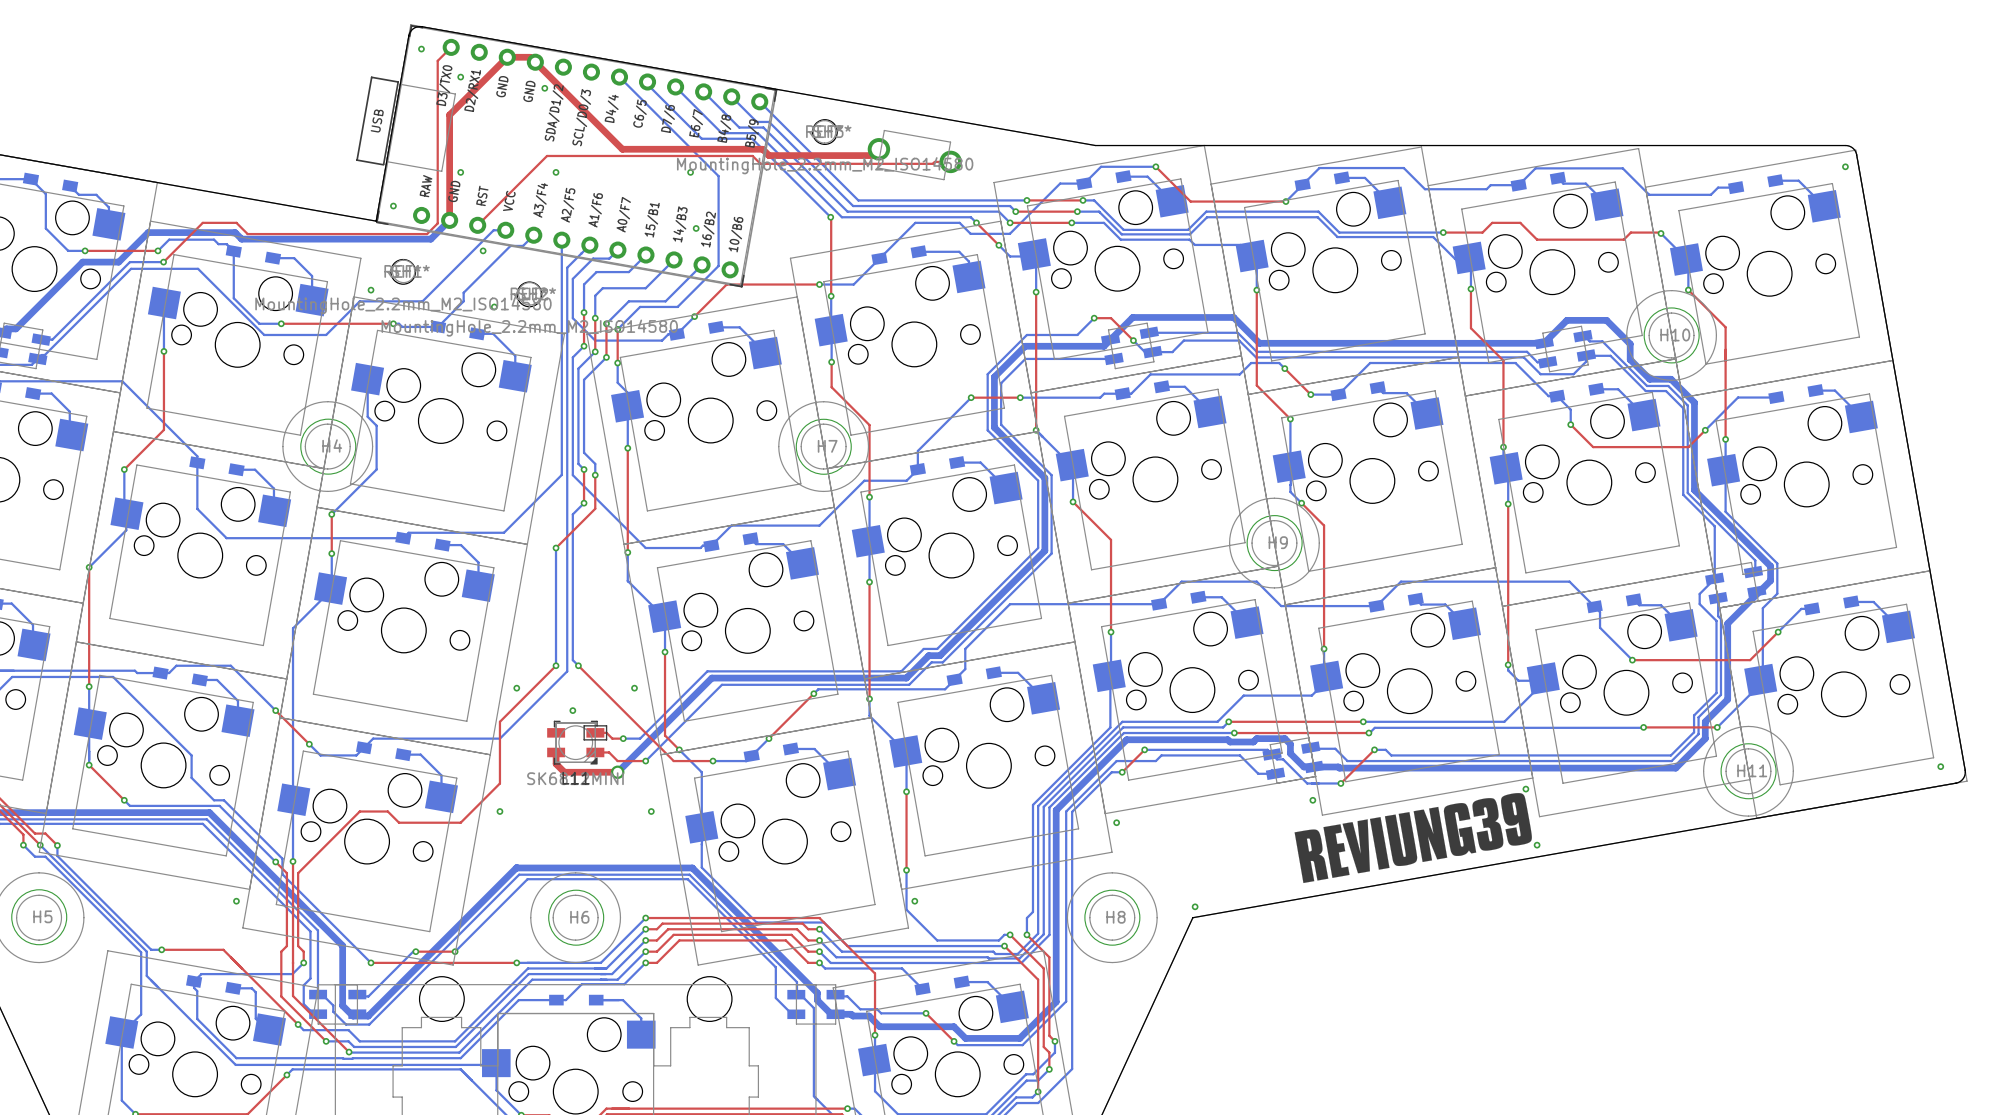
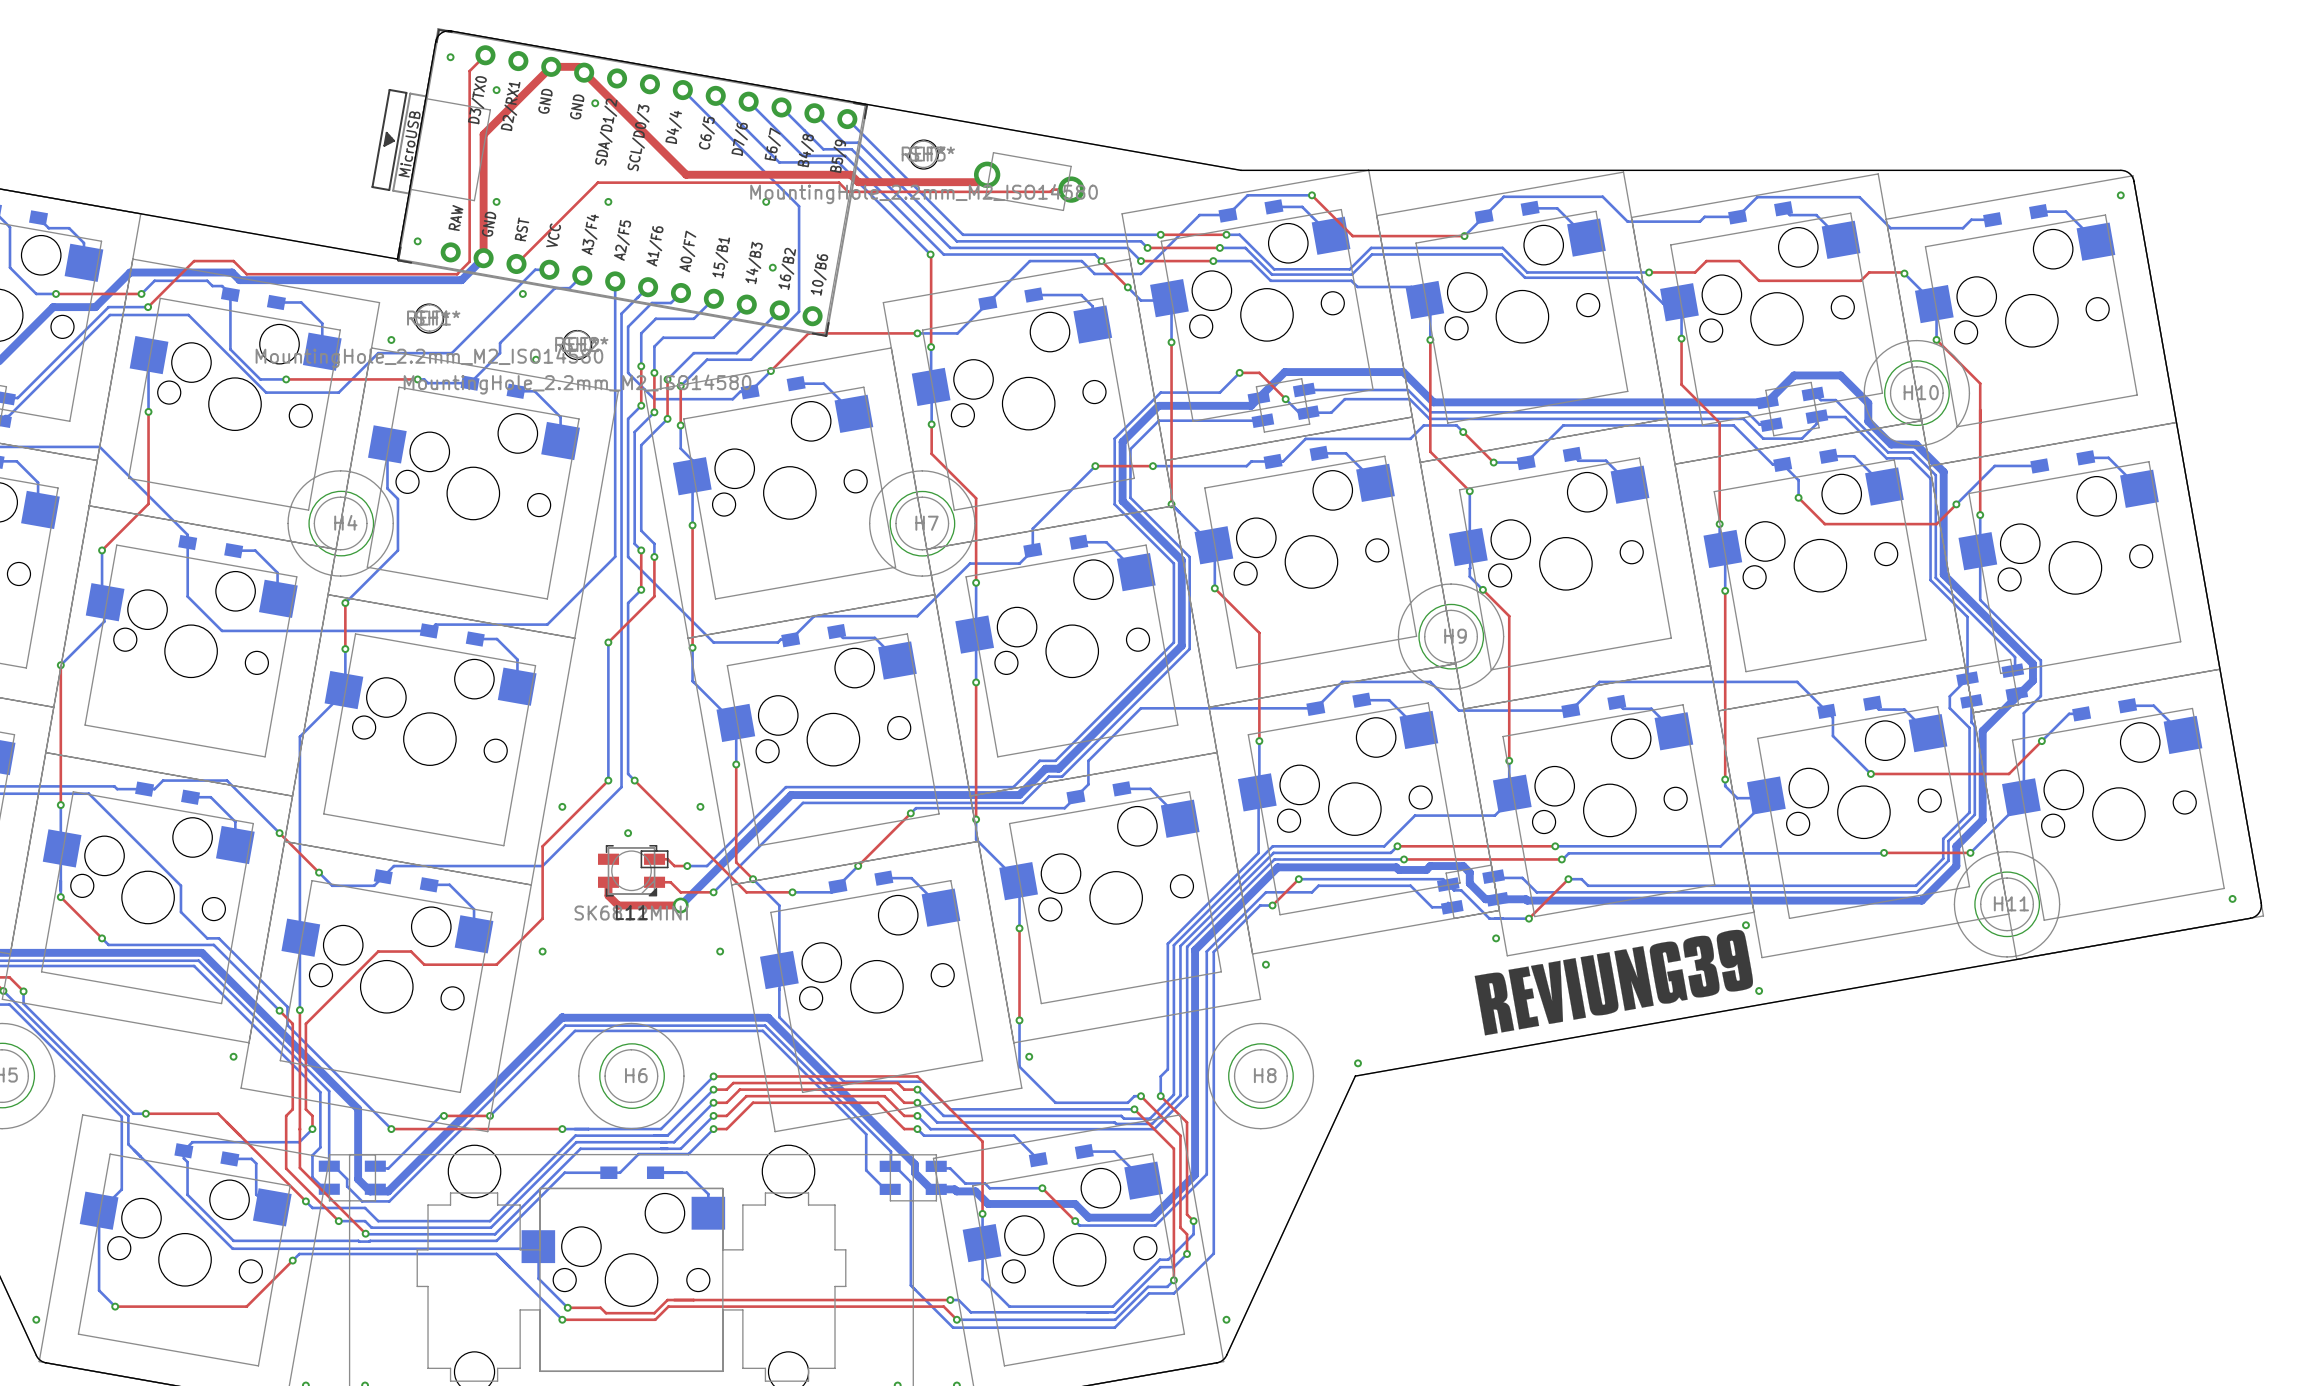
part footprint: [356, 24, 778, 288] -> [371, 28, 868, 337]

